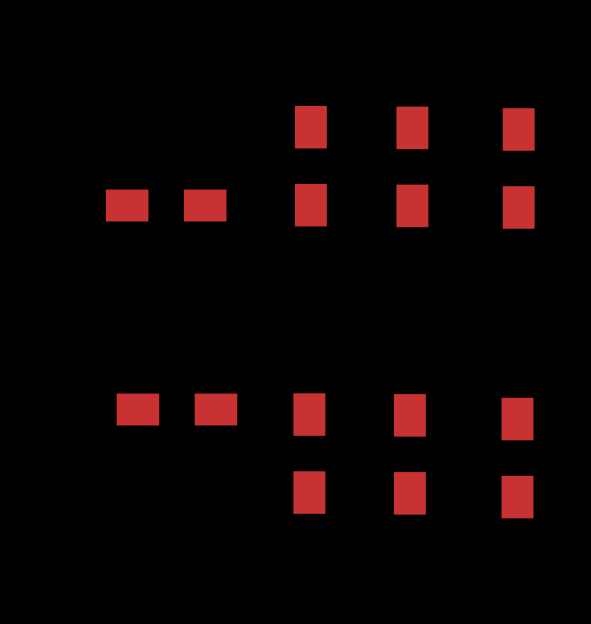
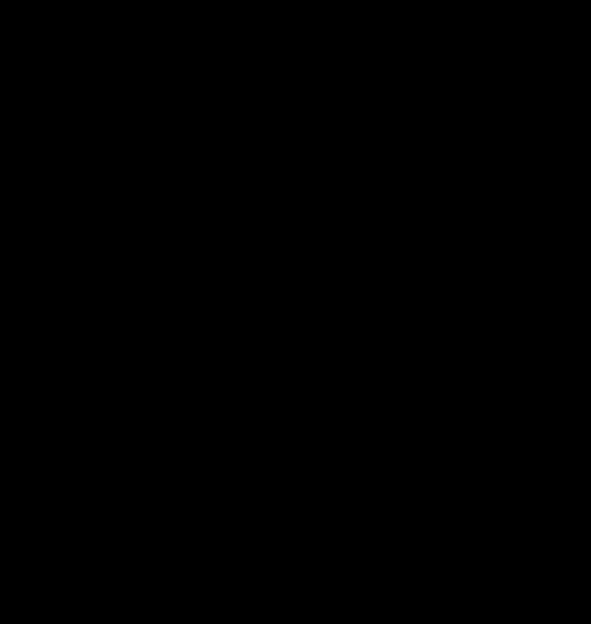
part: (310, 166) -> none
part: (412, 166) -> none
part: (518, 168) -> none
part: (166, 205) -> none
part: (176, 409) -> none
part: (309, 453) -> none
part: (409, 454) -> none
part: (517, 458) -> none

